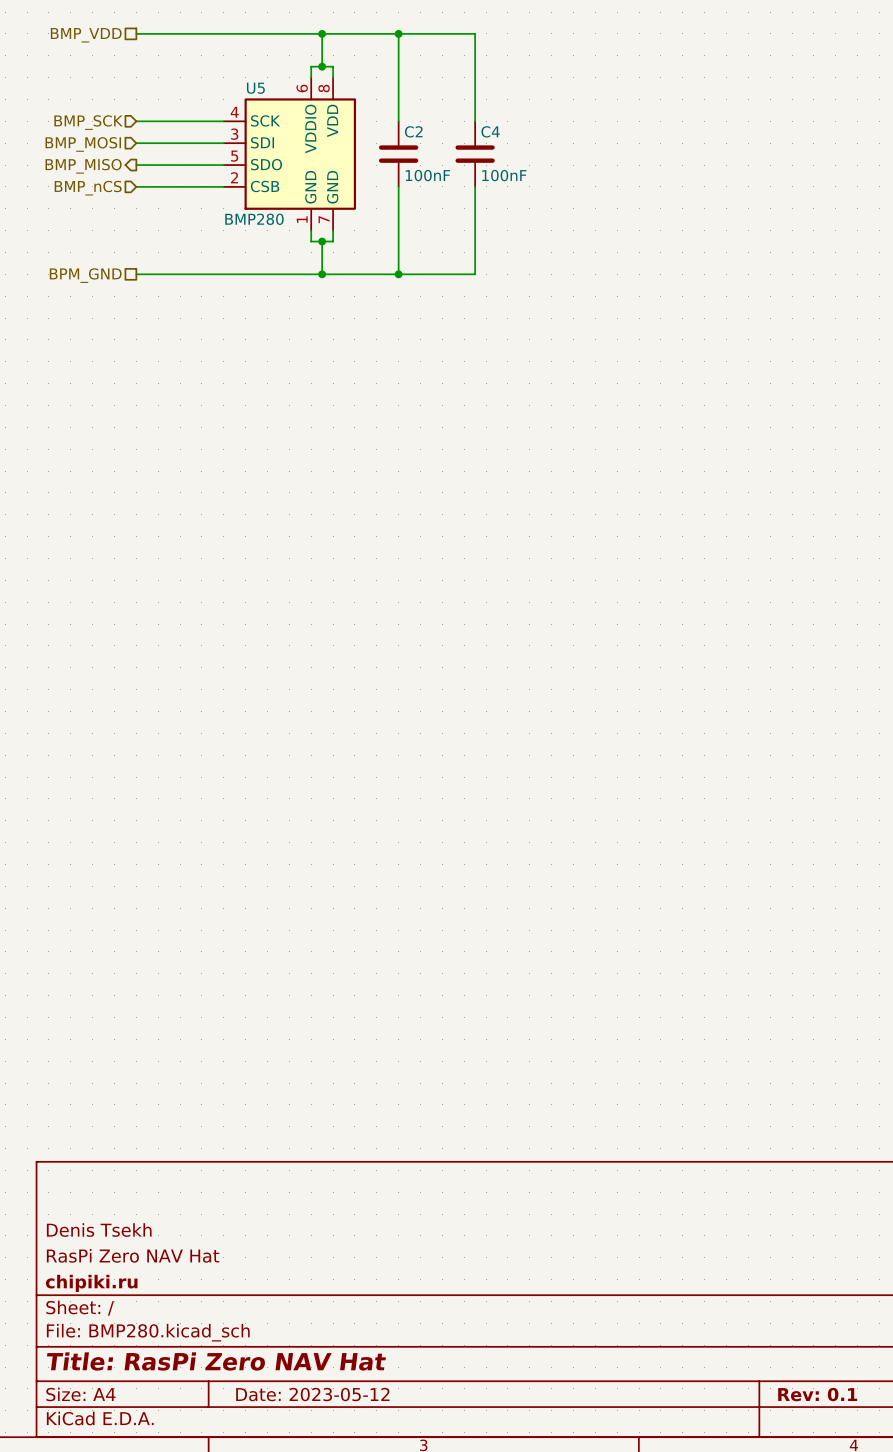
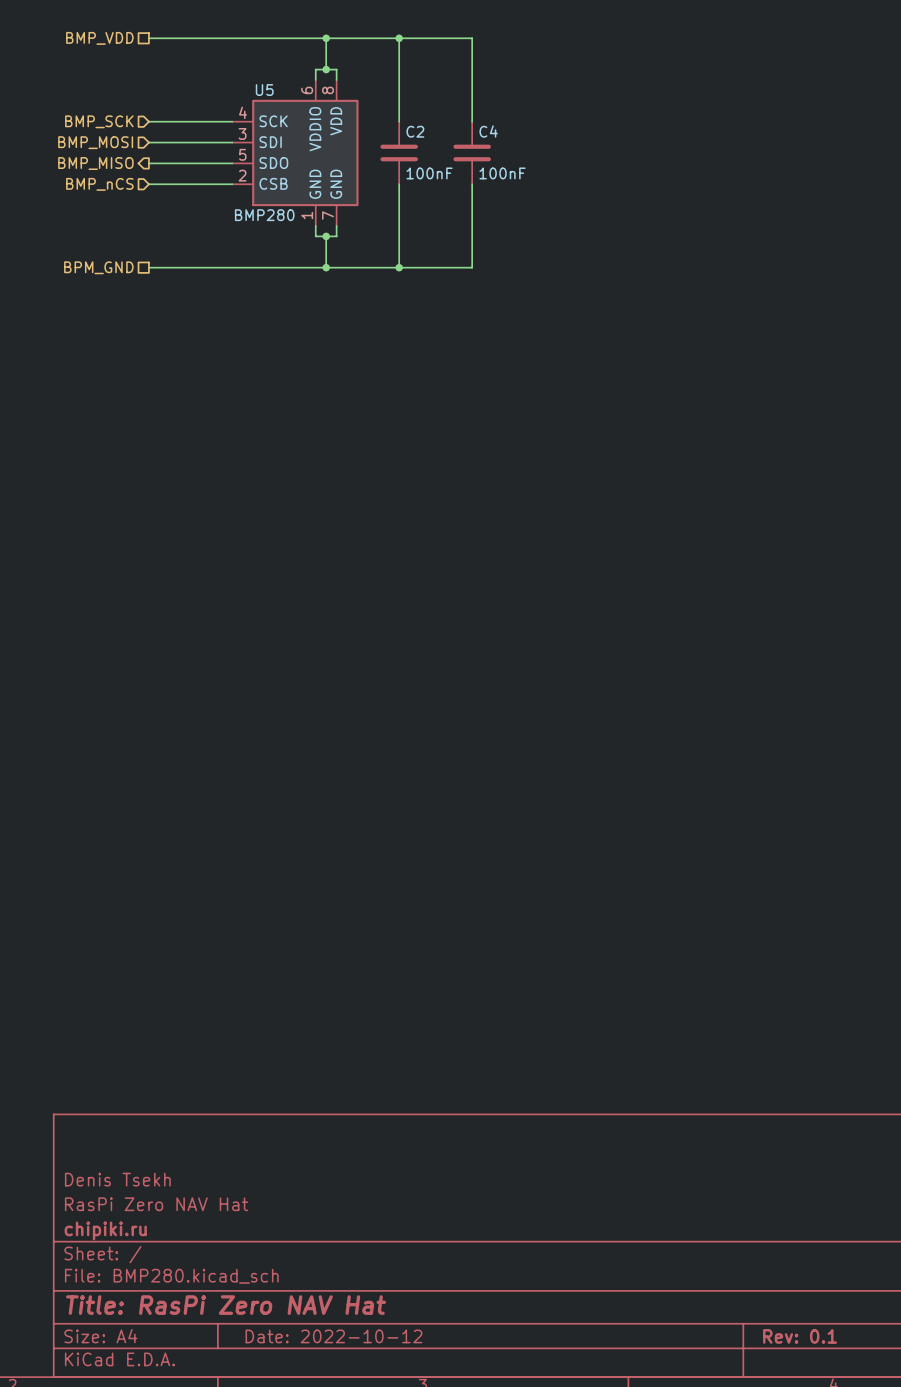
title block: Date: 2023-05-12 (312, 1394) -> Date: 2022-10-12 (333, 1336)

